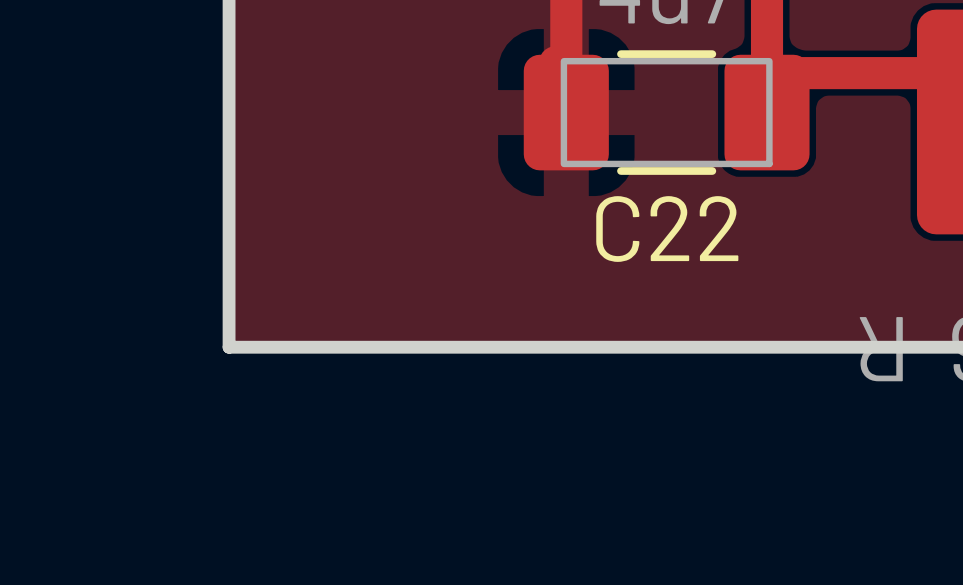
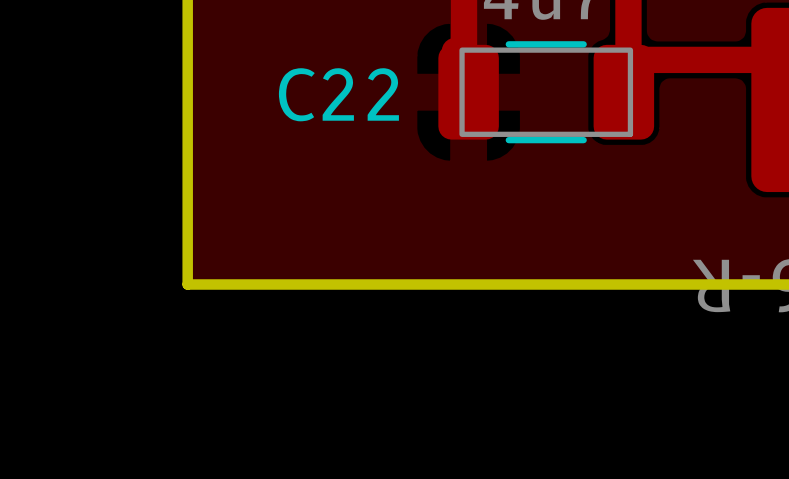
C22 footprint: [523, 50, 810, 175] -> [438, 41, 655, 144]
C22 name position: C22 (667, 229) -> C22 (338, 94)

